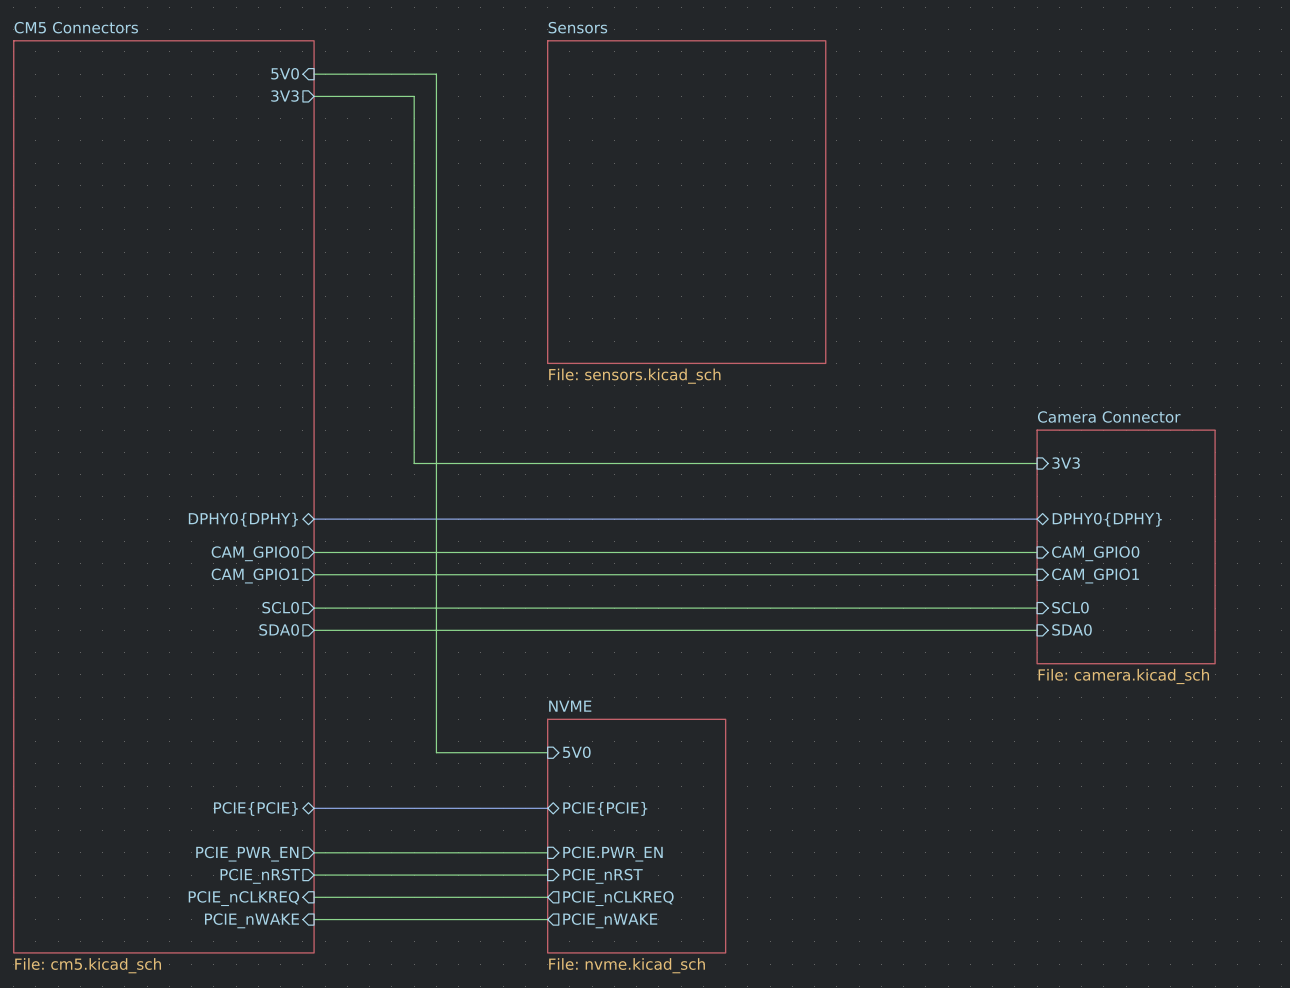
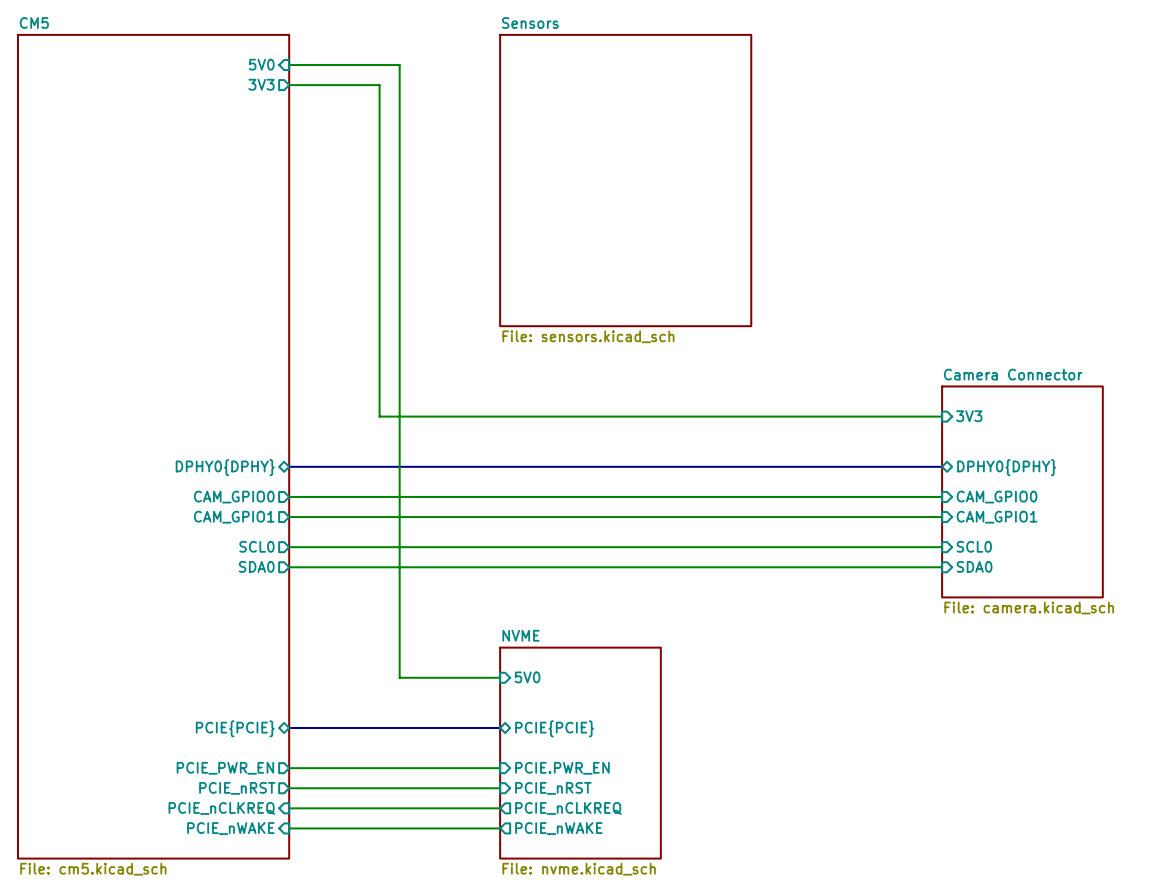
sheet CM5 Connectors name: CM5 Connectors (76, 27) -> CM5 (34, 23)

